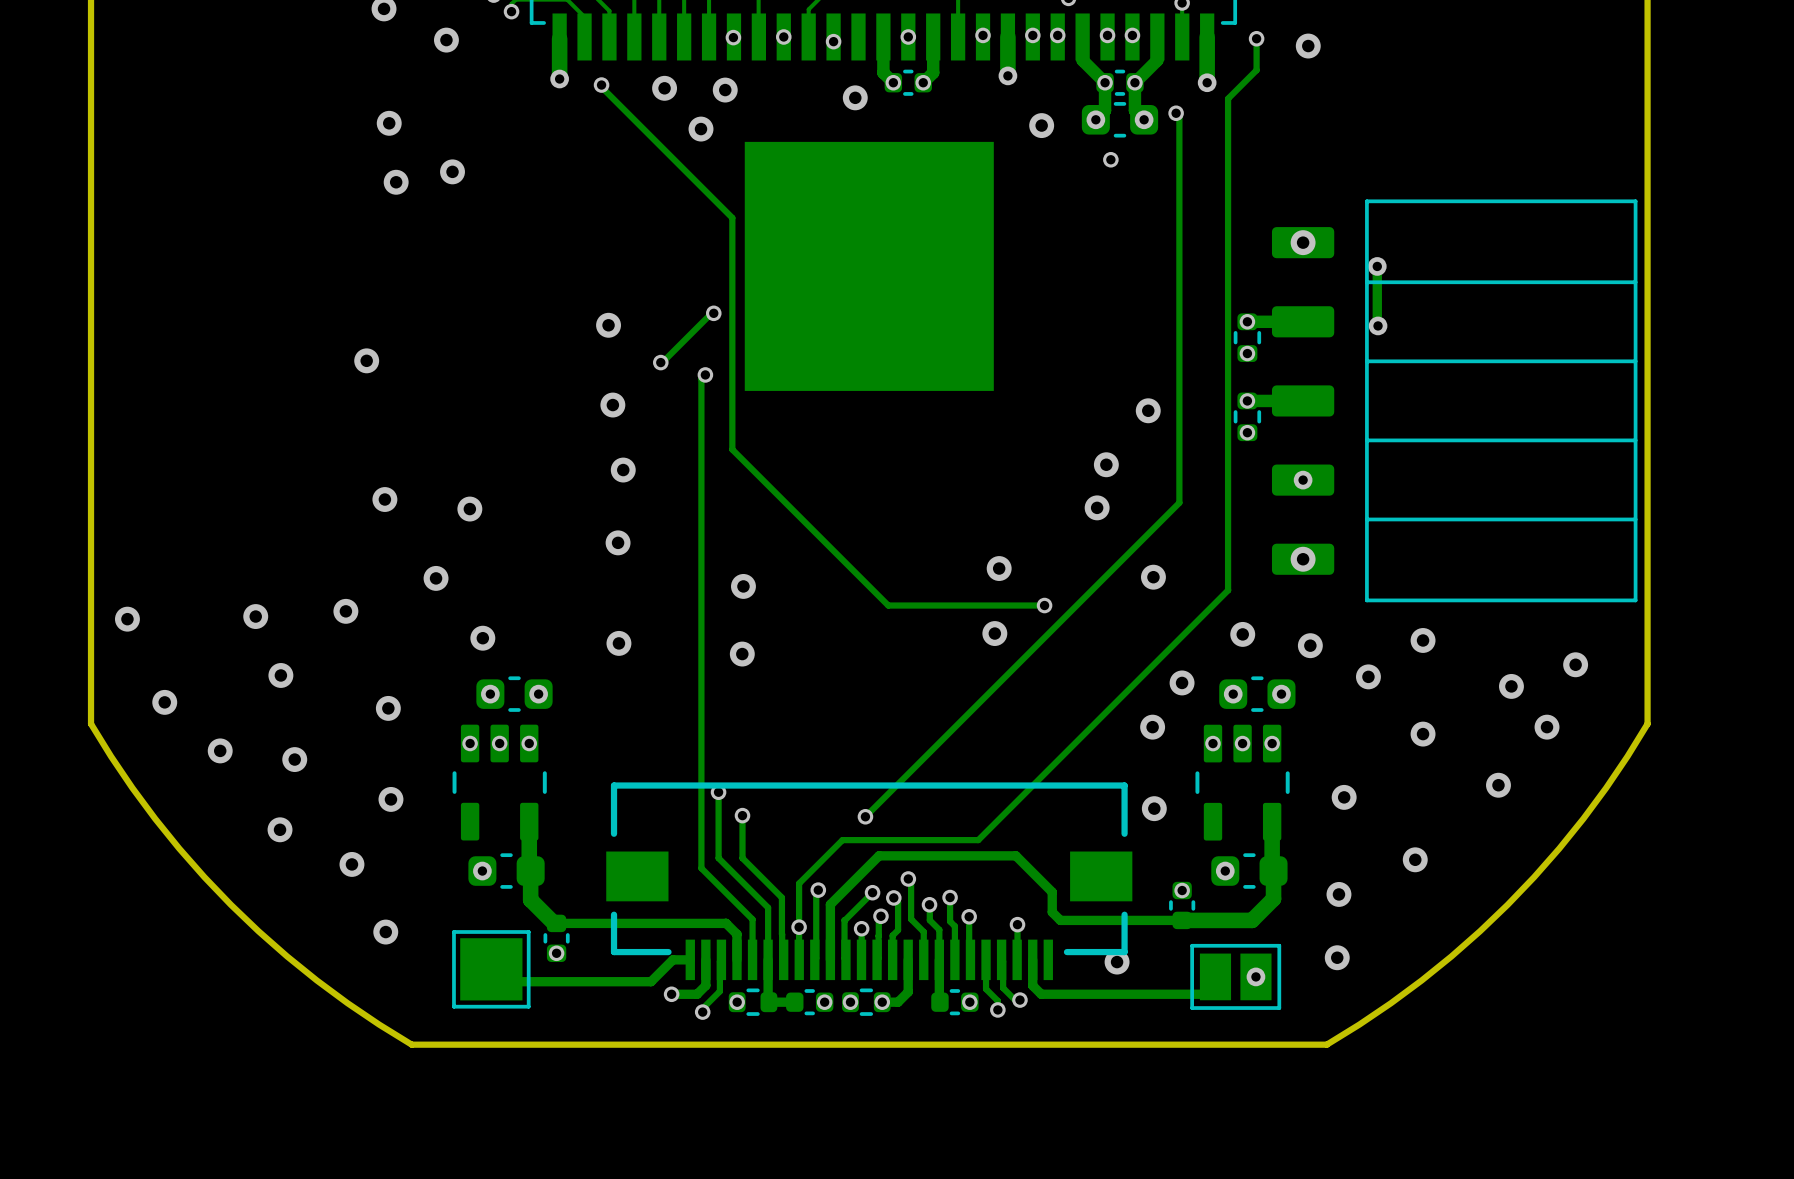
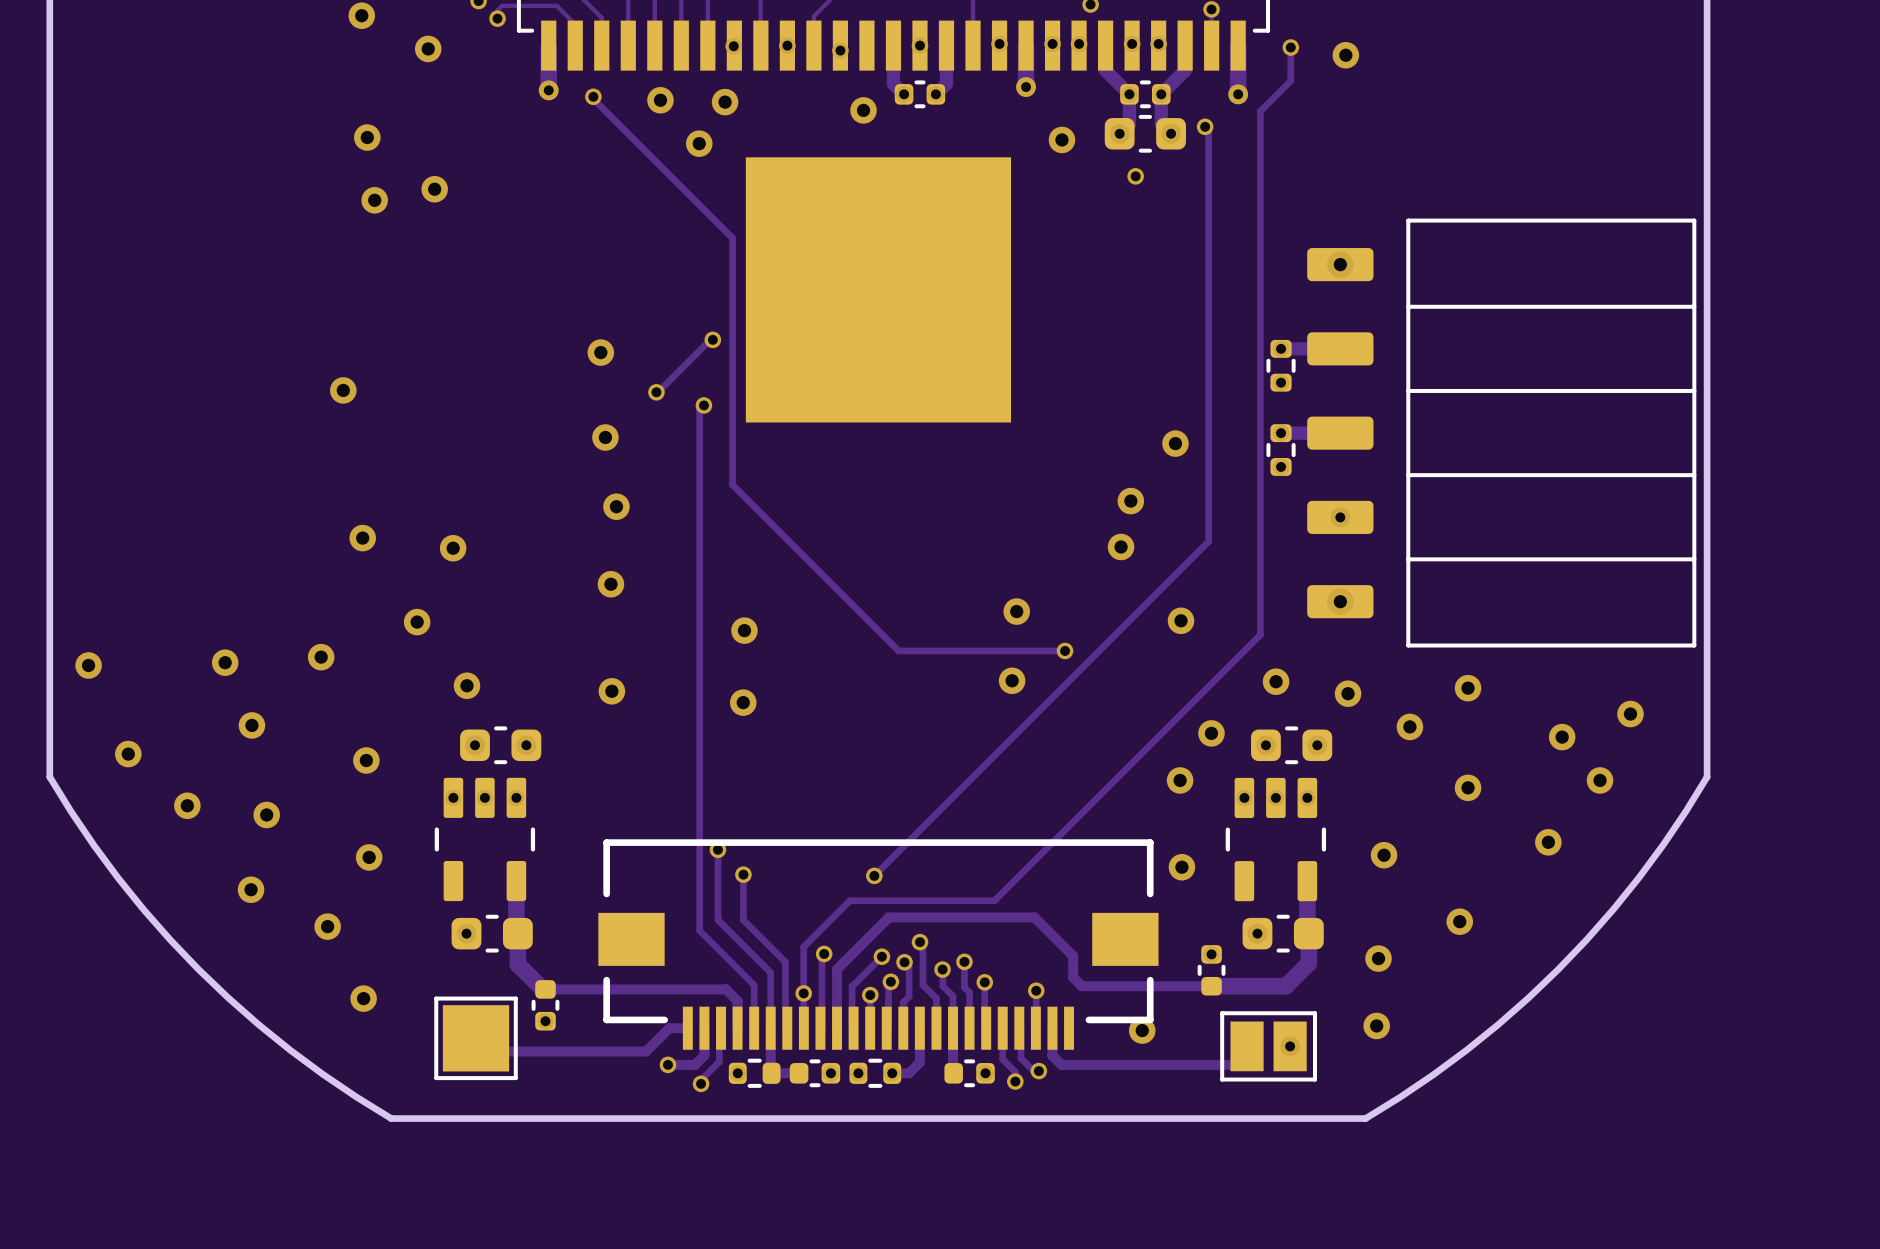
track: (1377, 266) (1378, 325) -> none
via: (1377, 266) -> none
via: (1378, 325) -> none

